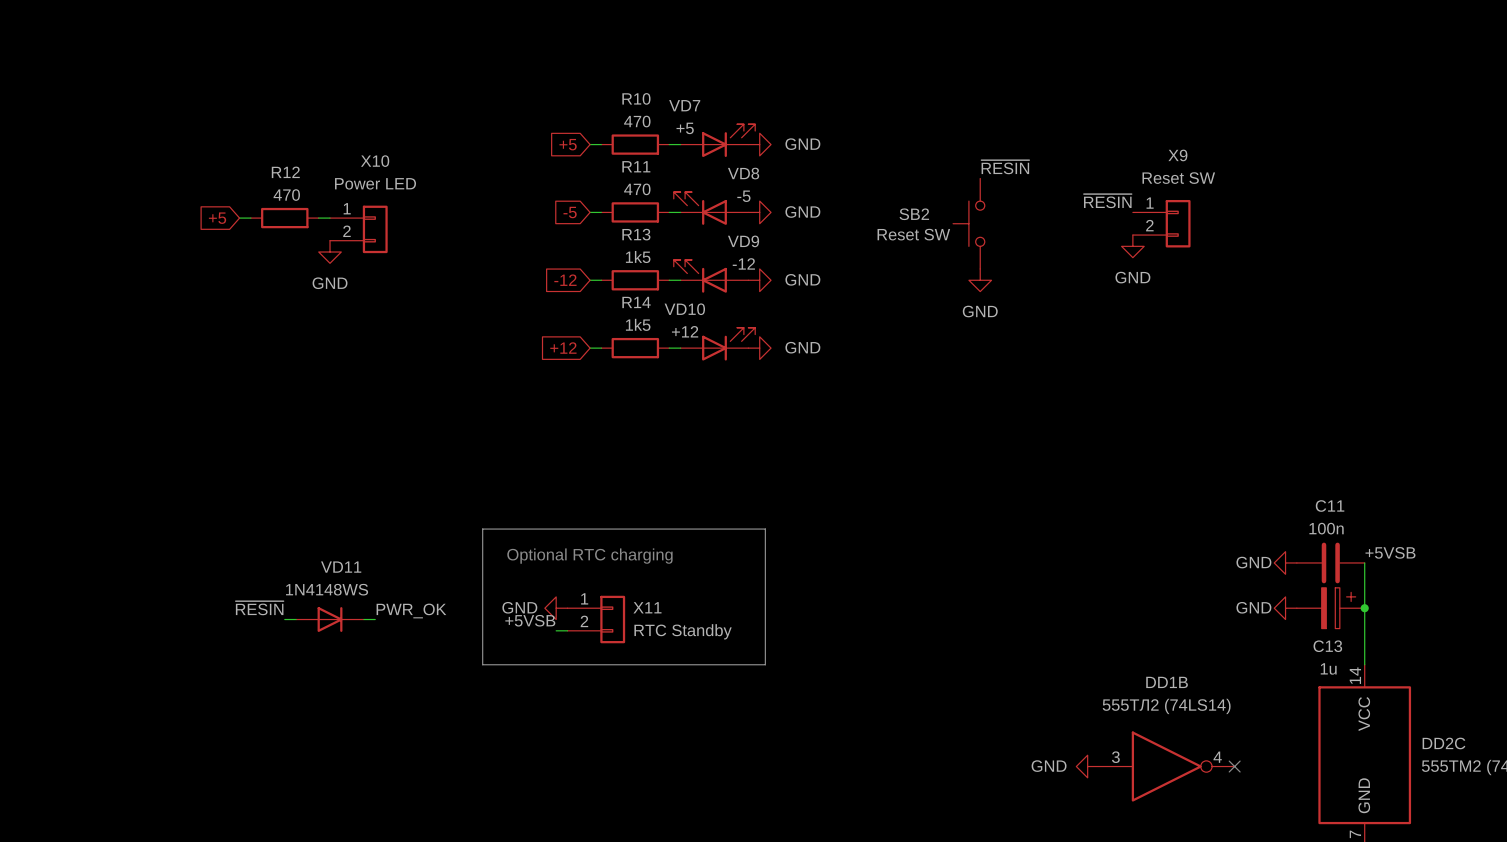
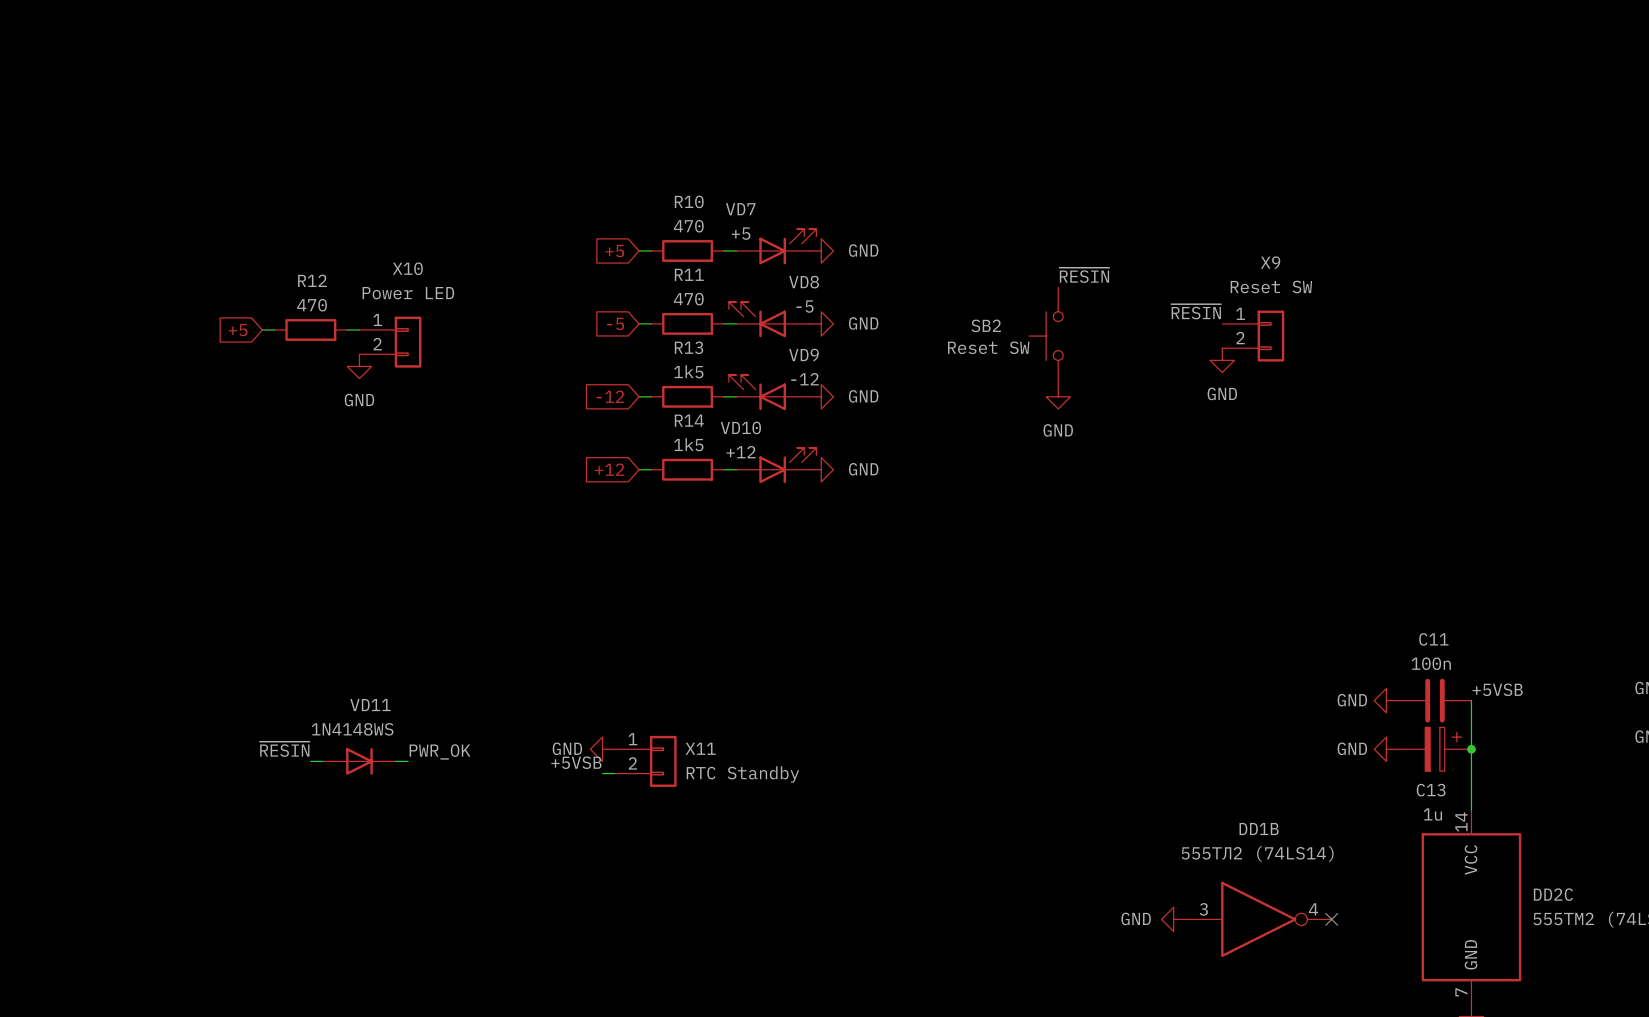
line: (482, 529) (765, 529) (765, 664) (482, 664) (482, 529) -> none
text: Optional RTC charging (589, 556) -> none

